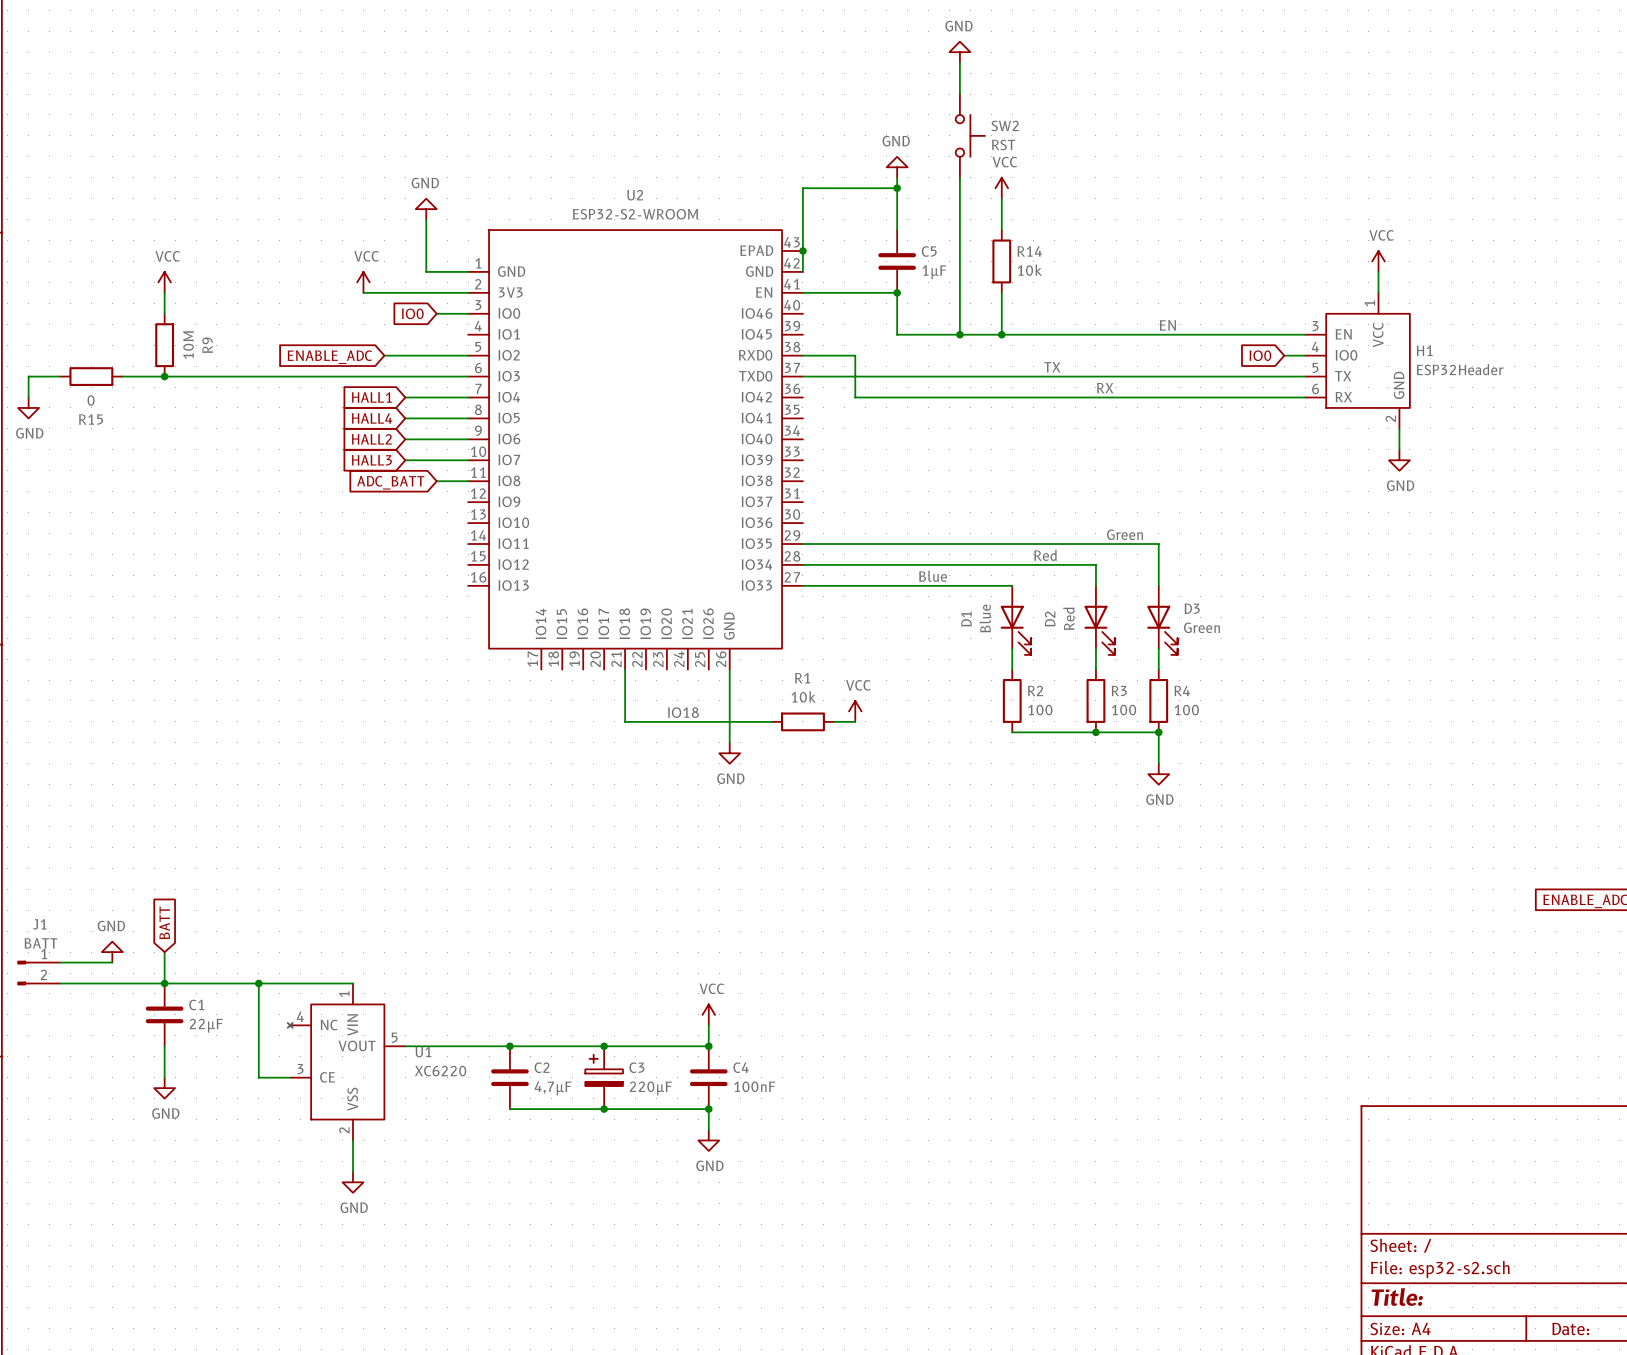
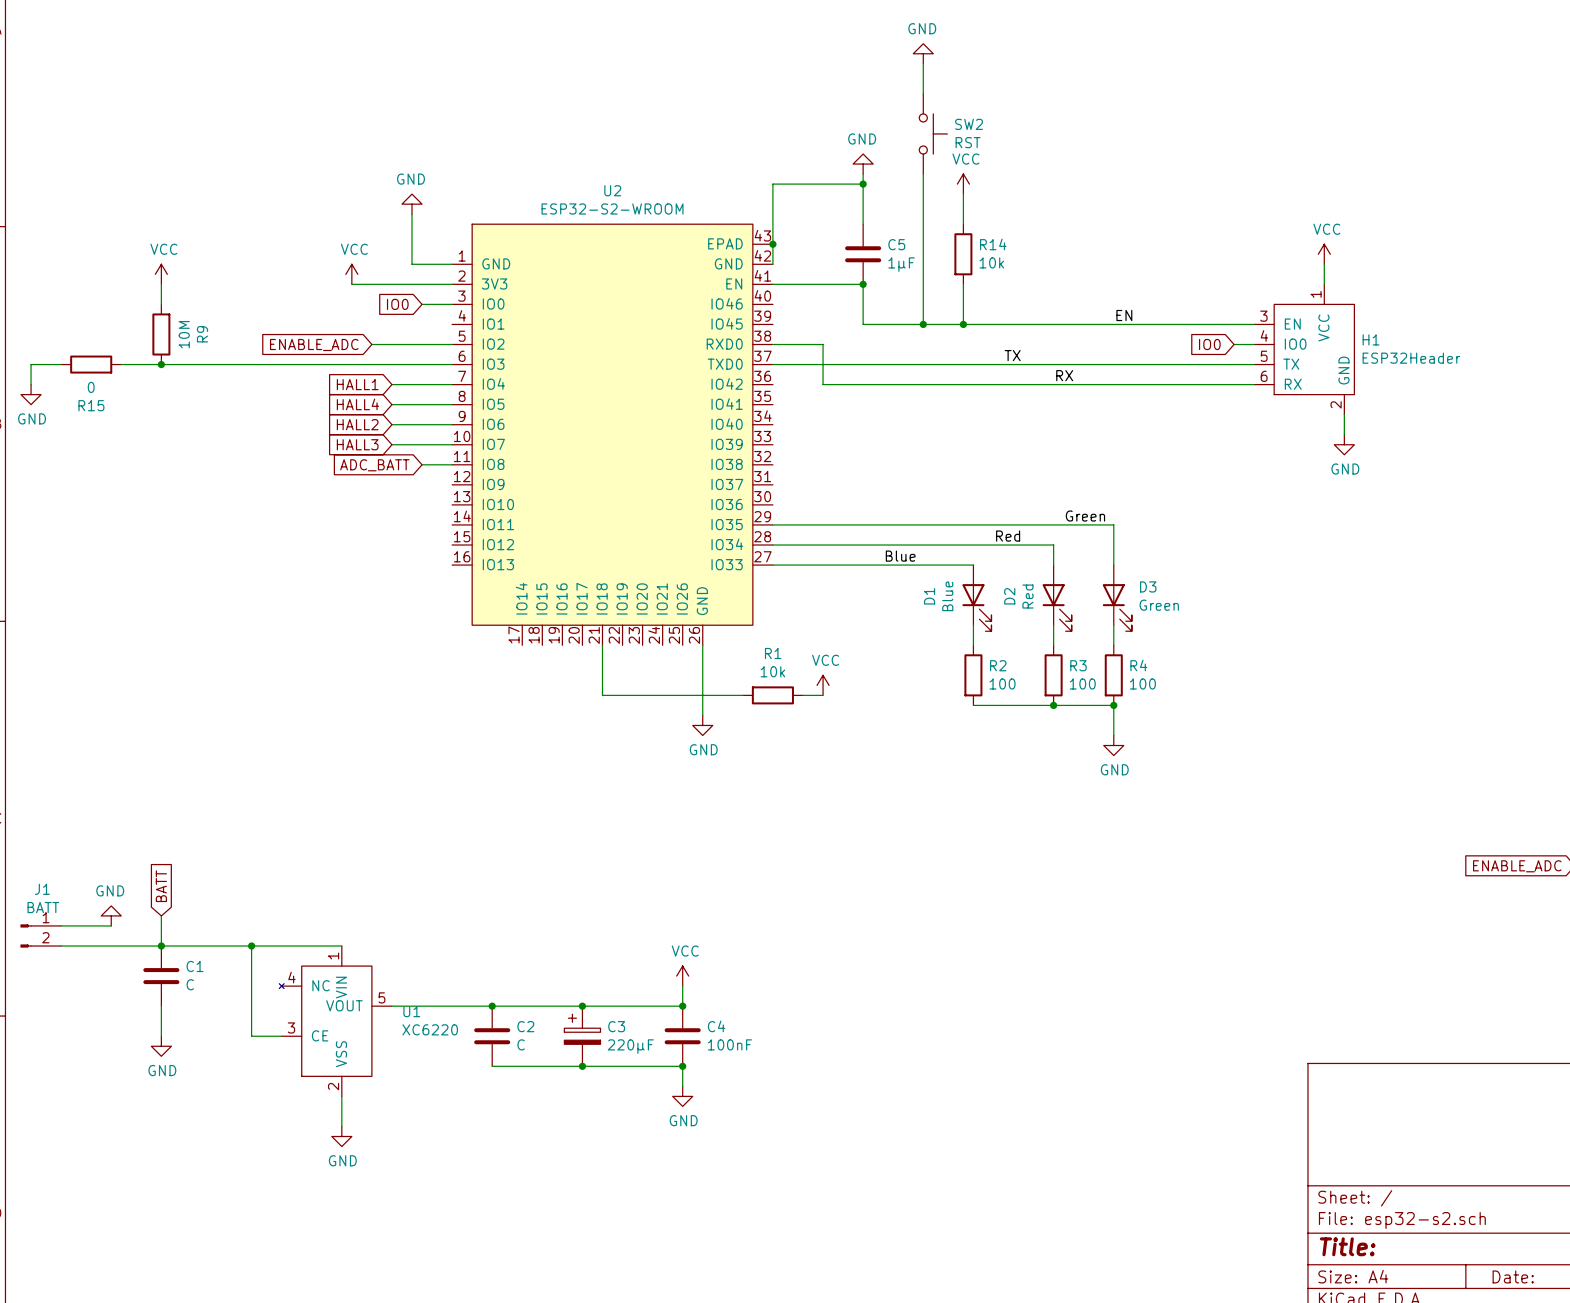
label: IO18 (683, 712) -> none
C1 value: 22µF (206, 1025) -> C (190, 984)
C2 value: 4,7µF (553, 1088) -> C (521, 1044)

